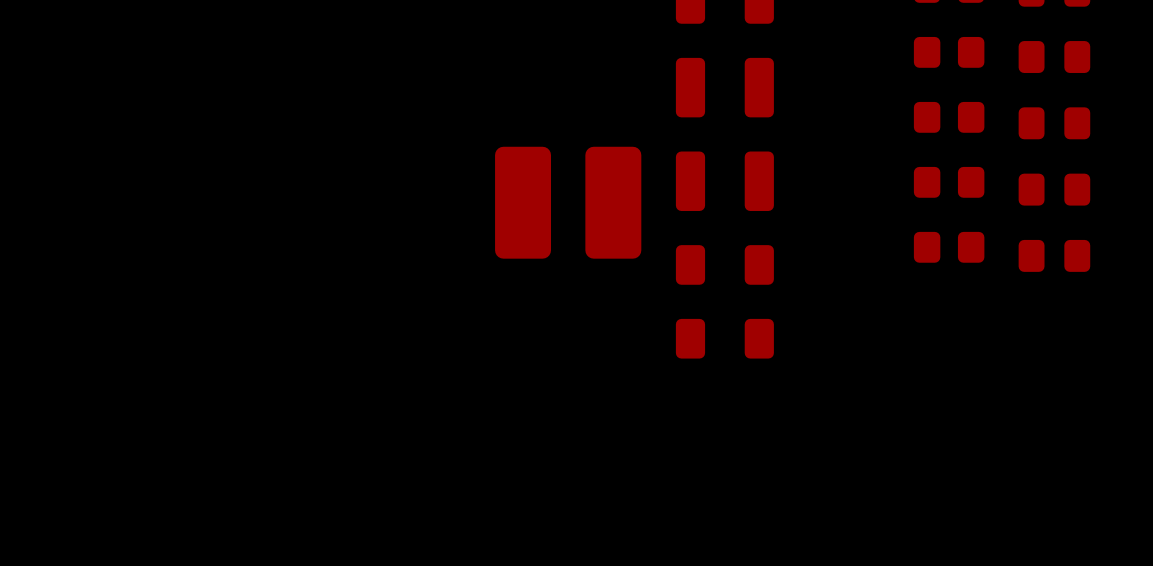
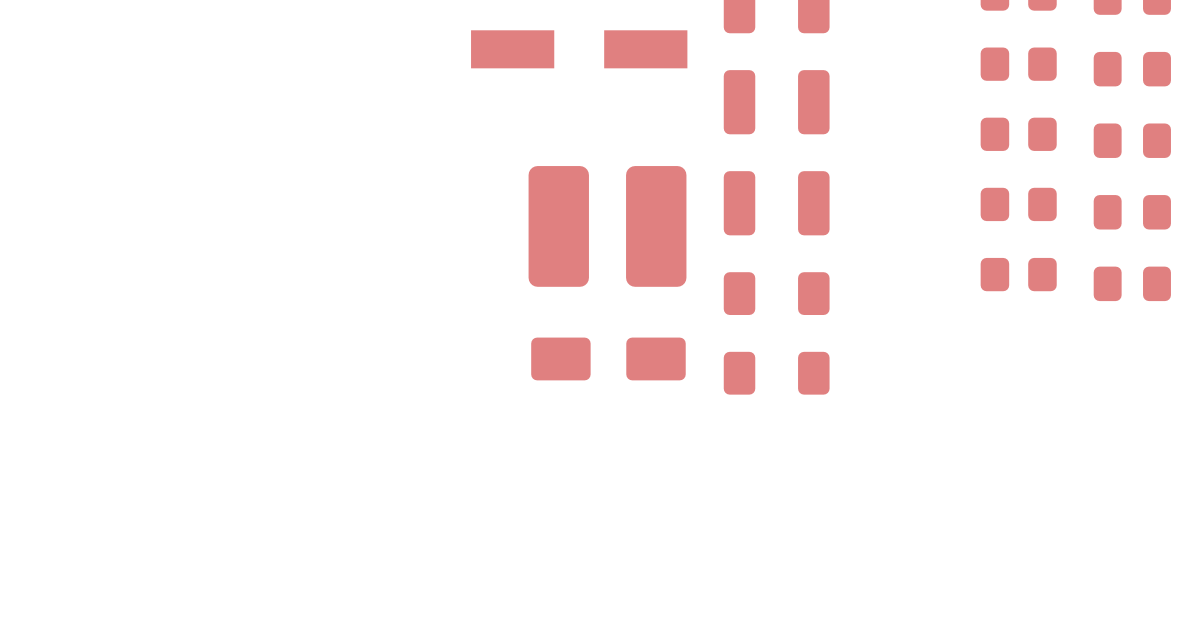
part: none -> (579, 49)
part: none -> (608, 358)

